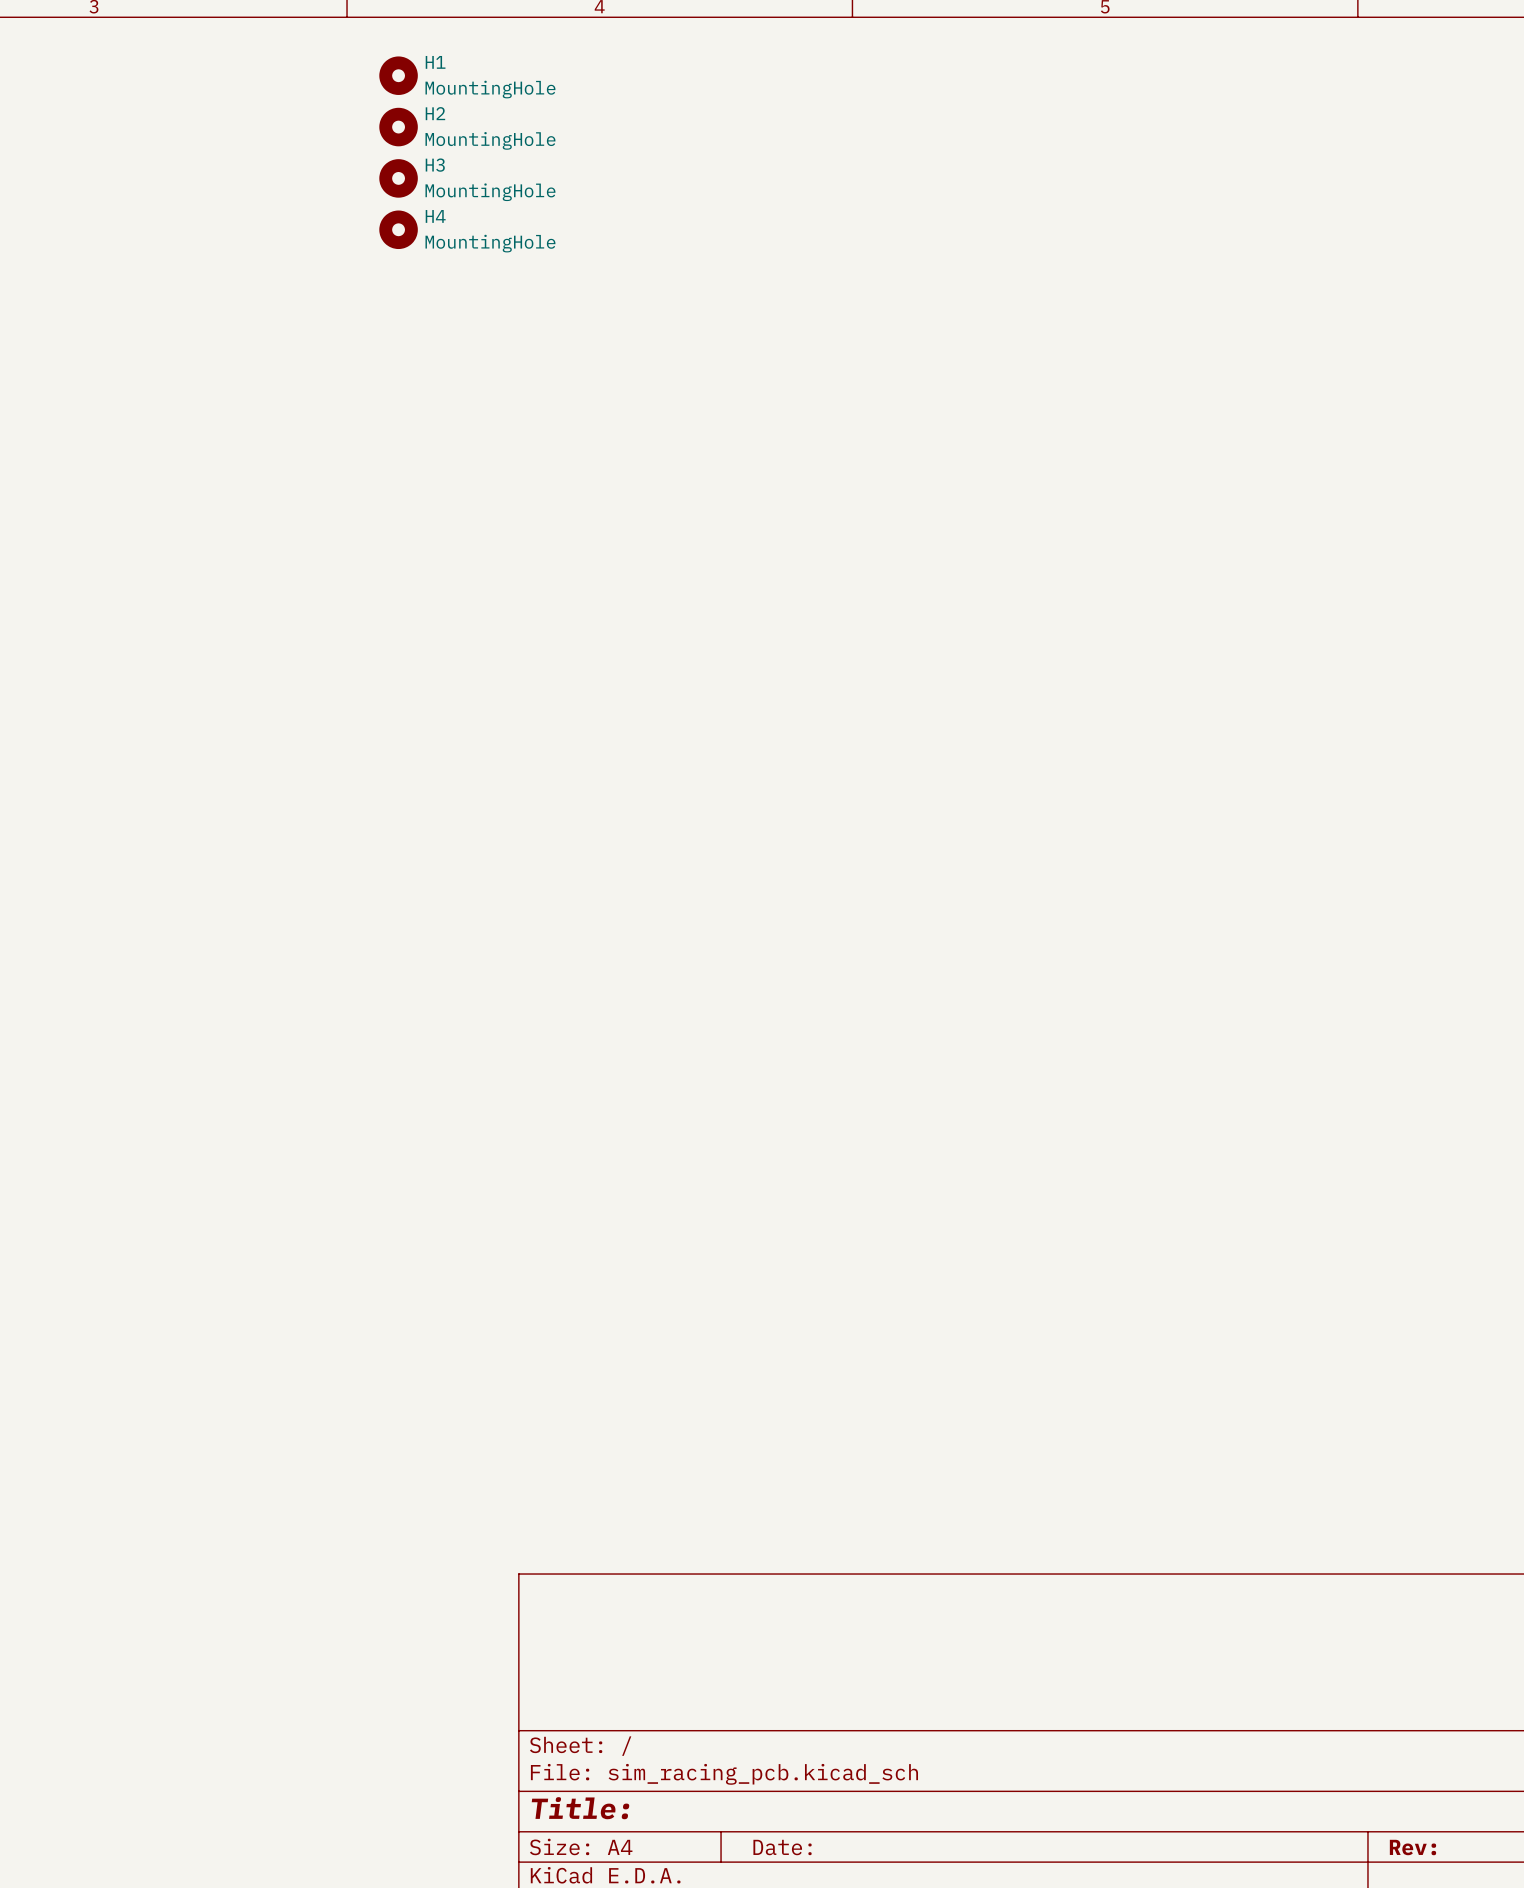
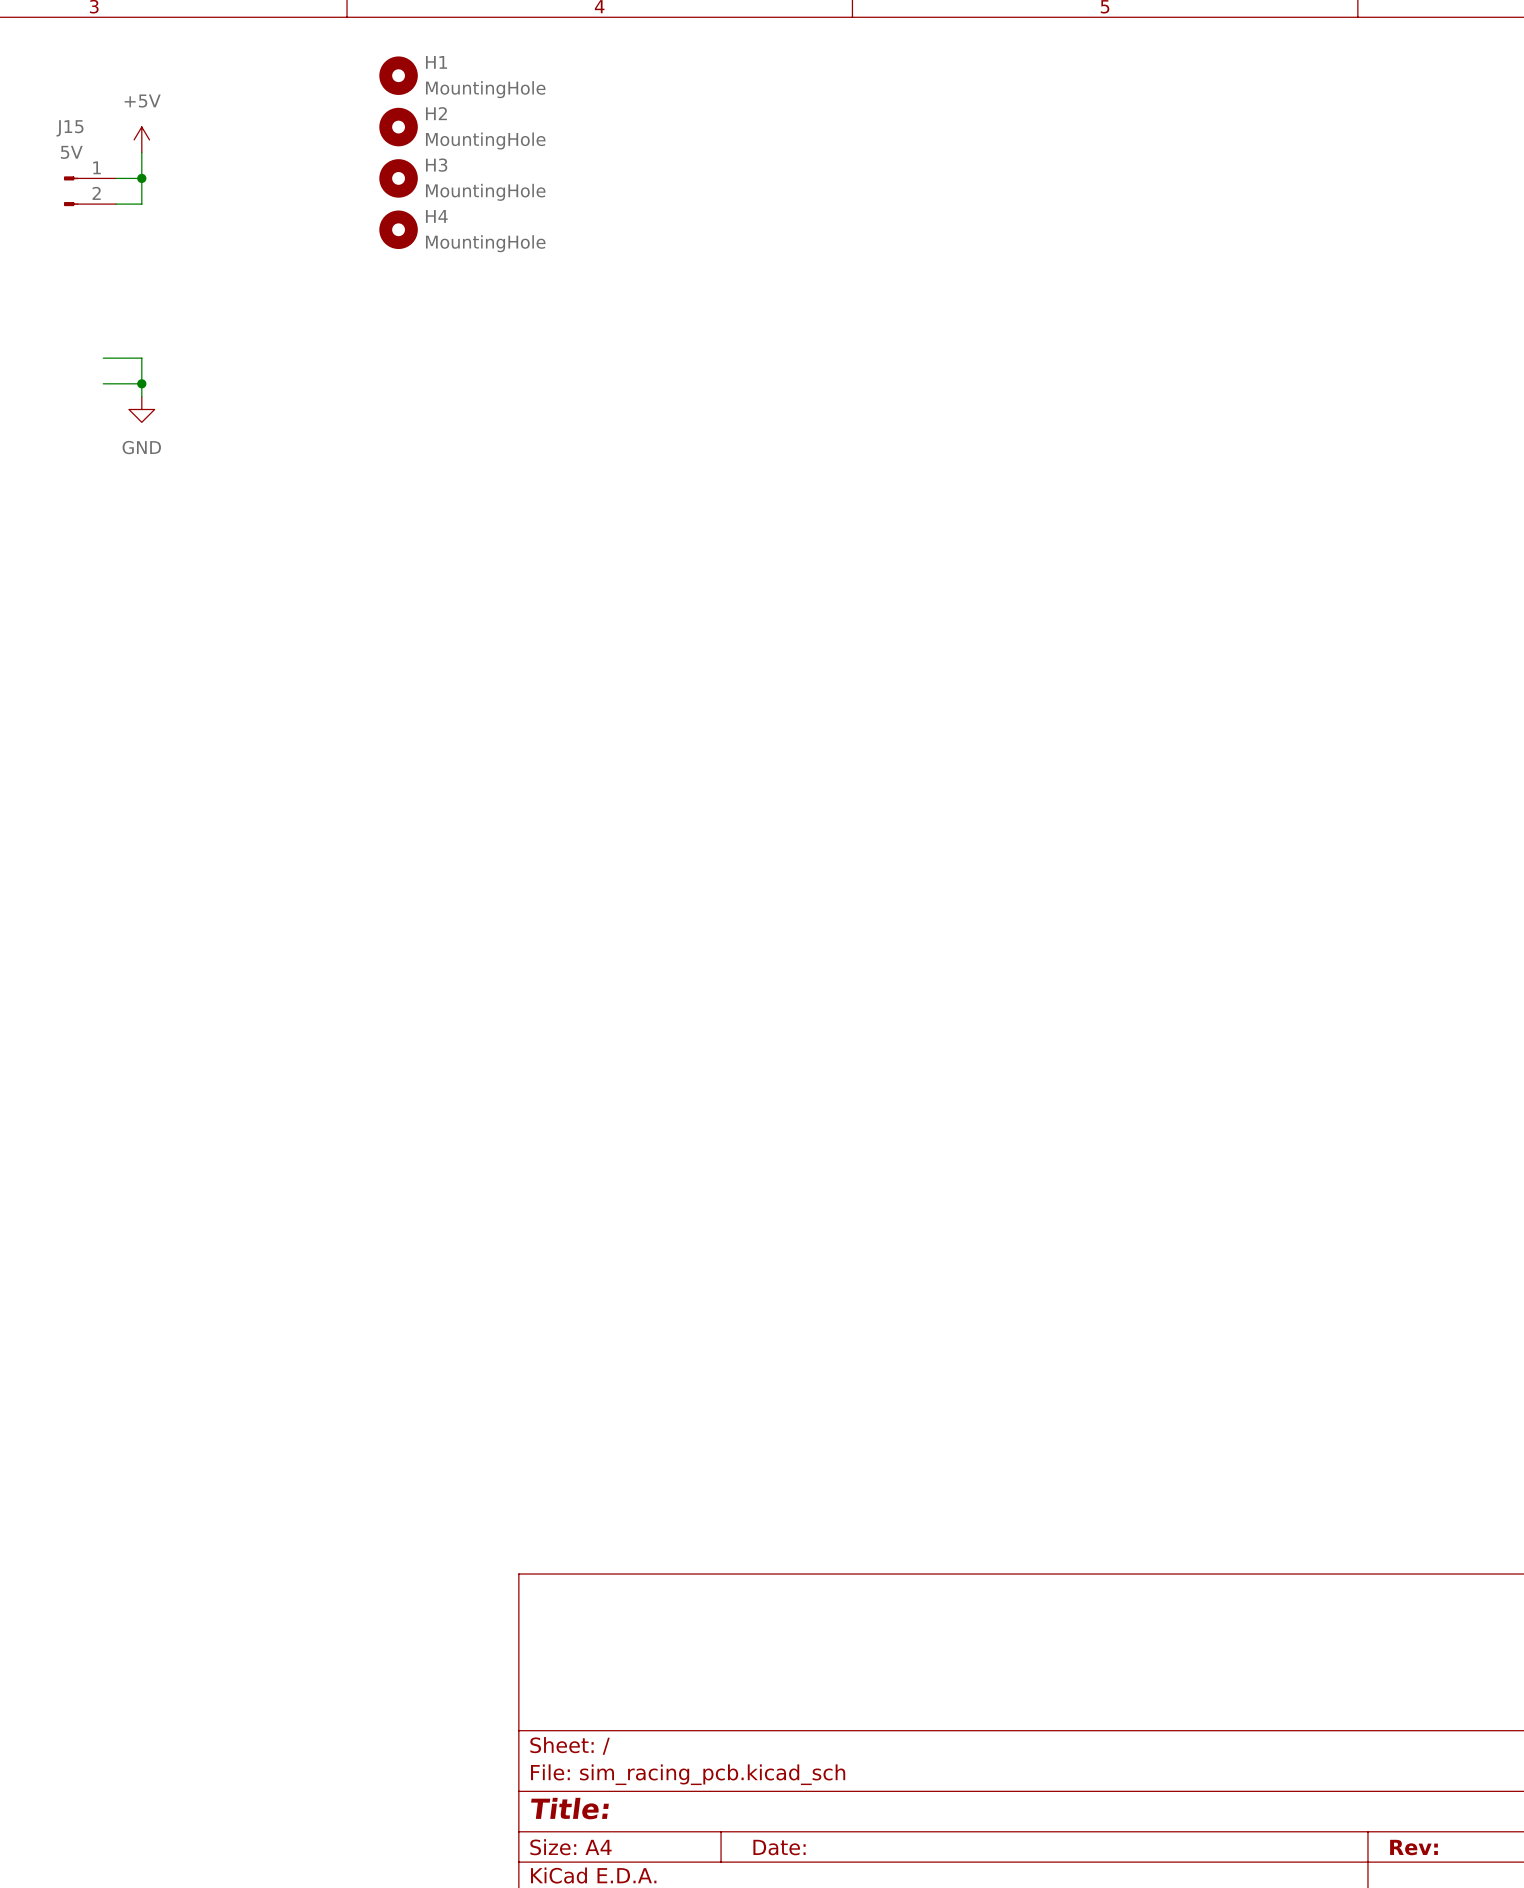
power symbol: none -> +5V (141, 139)
wire: none -> (141, 152) (141, 204) (116, 204)
wire: none -> (116, 178) (141, 178)
junction: none -> (141, 178)
J15: none -> 5V (90, 191)
wire: none -> (103, 358) (141, 358) (141, 396)
wire: none -> (103, 383) (141, 383)
junction: none -> (141, 383)
power symbol: none -> GND (141, 409)

